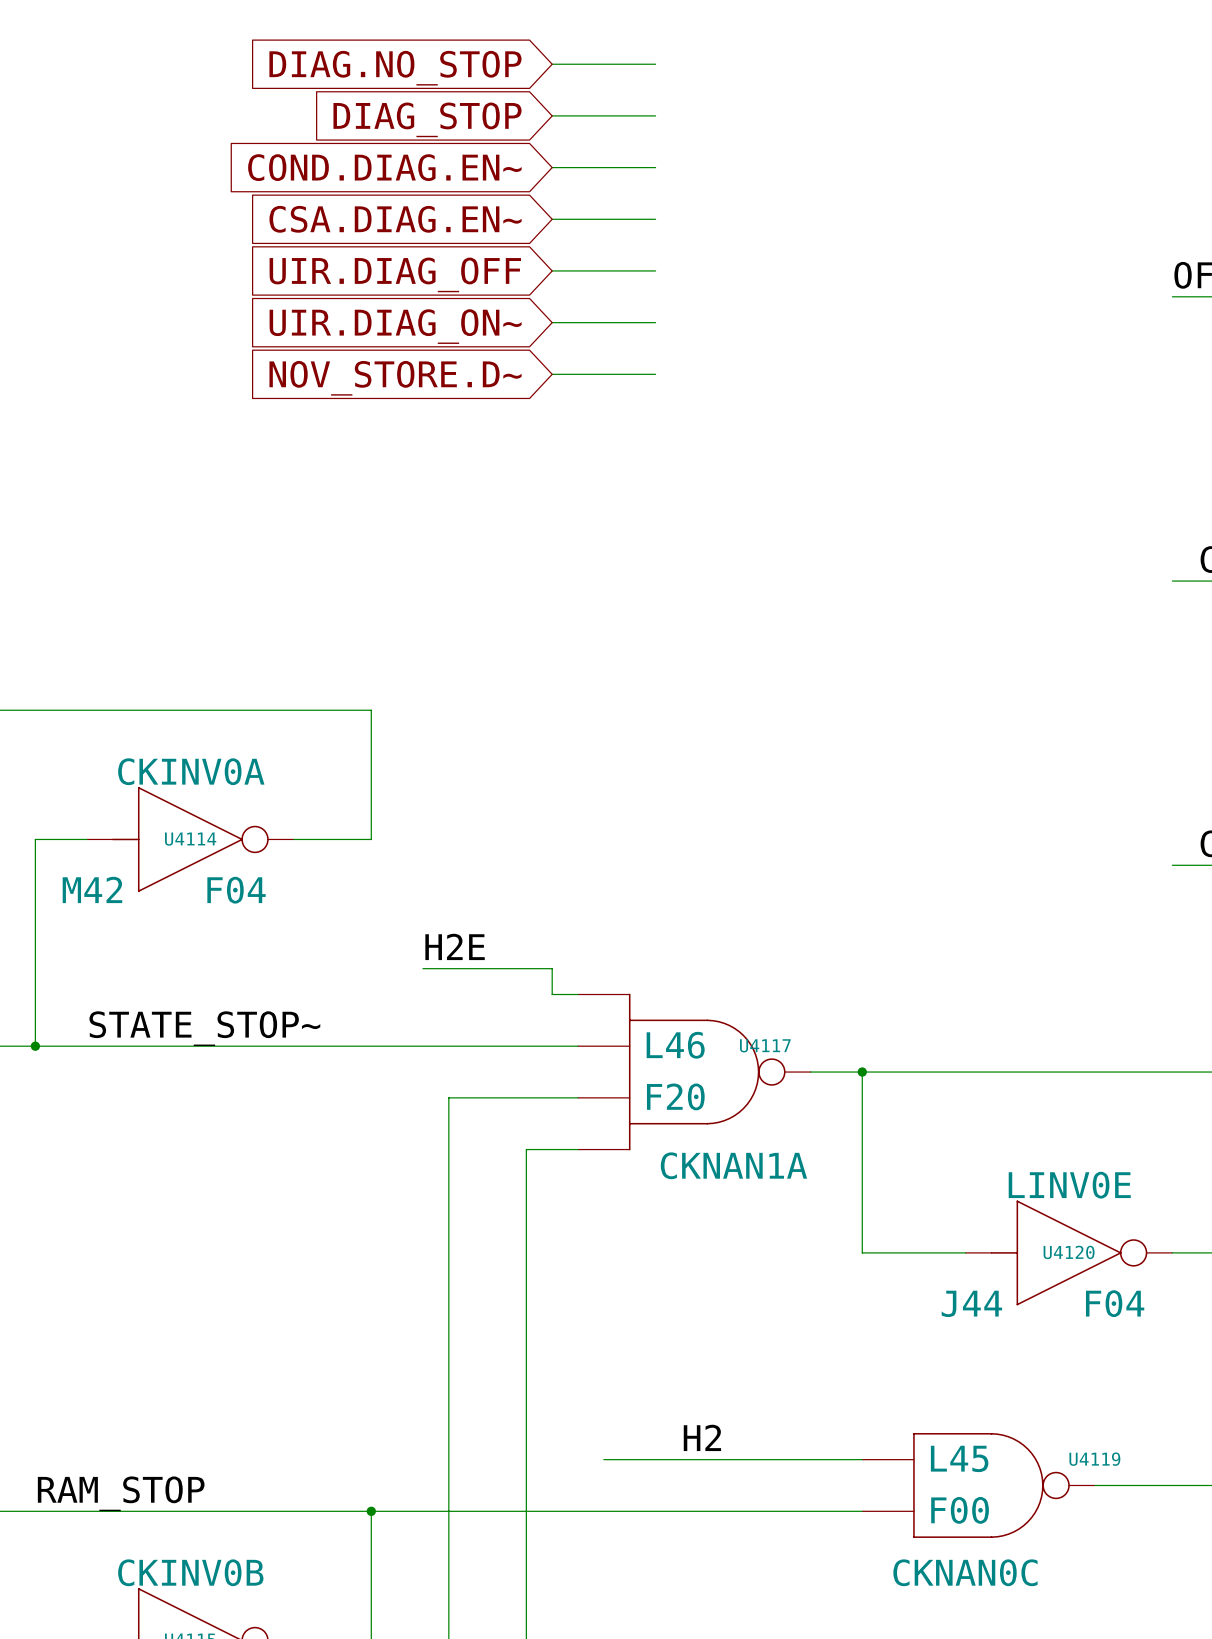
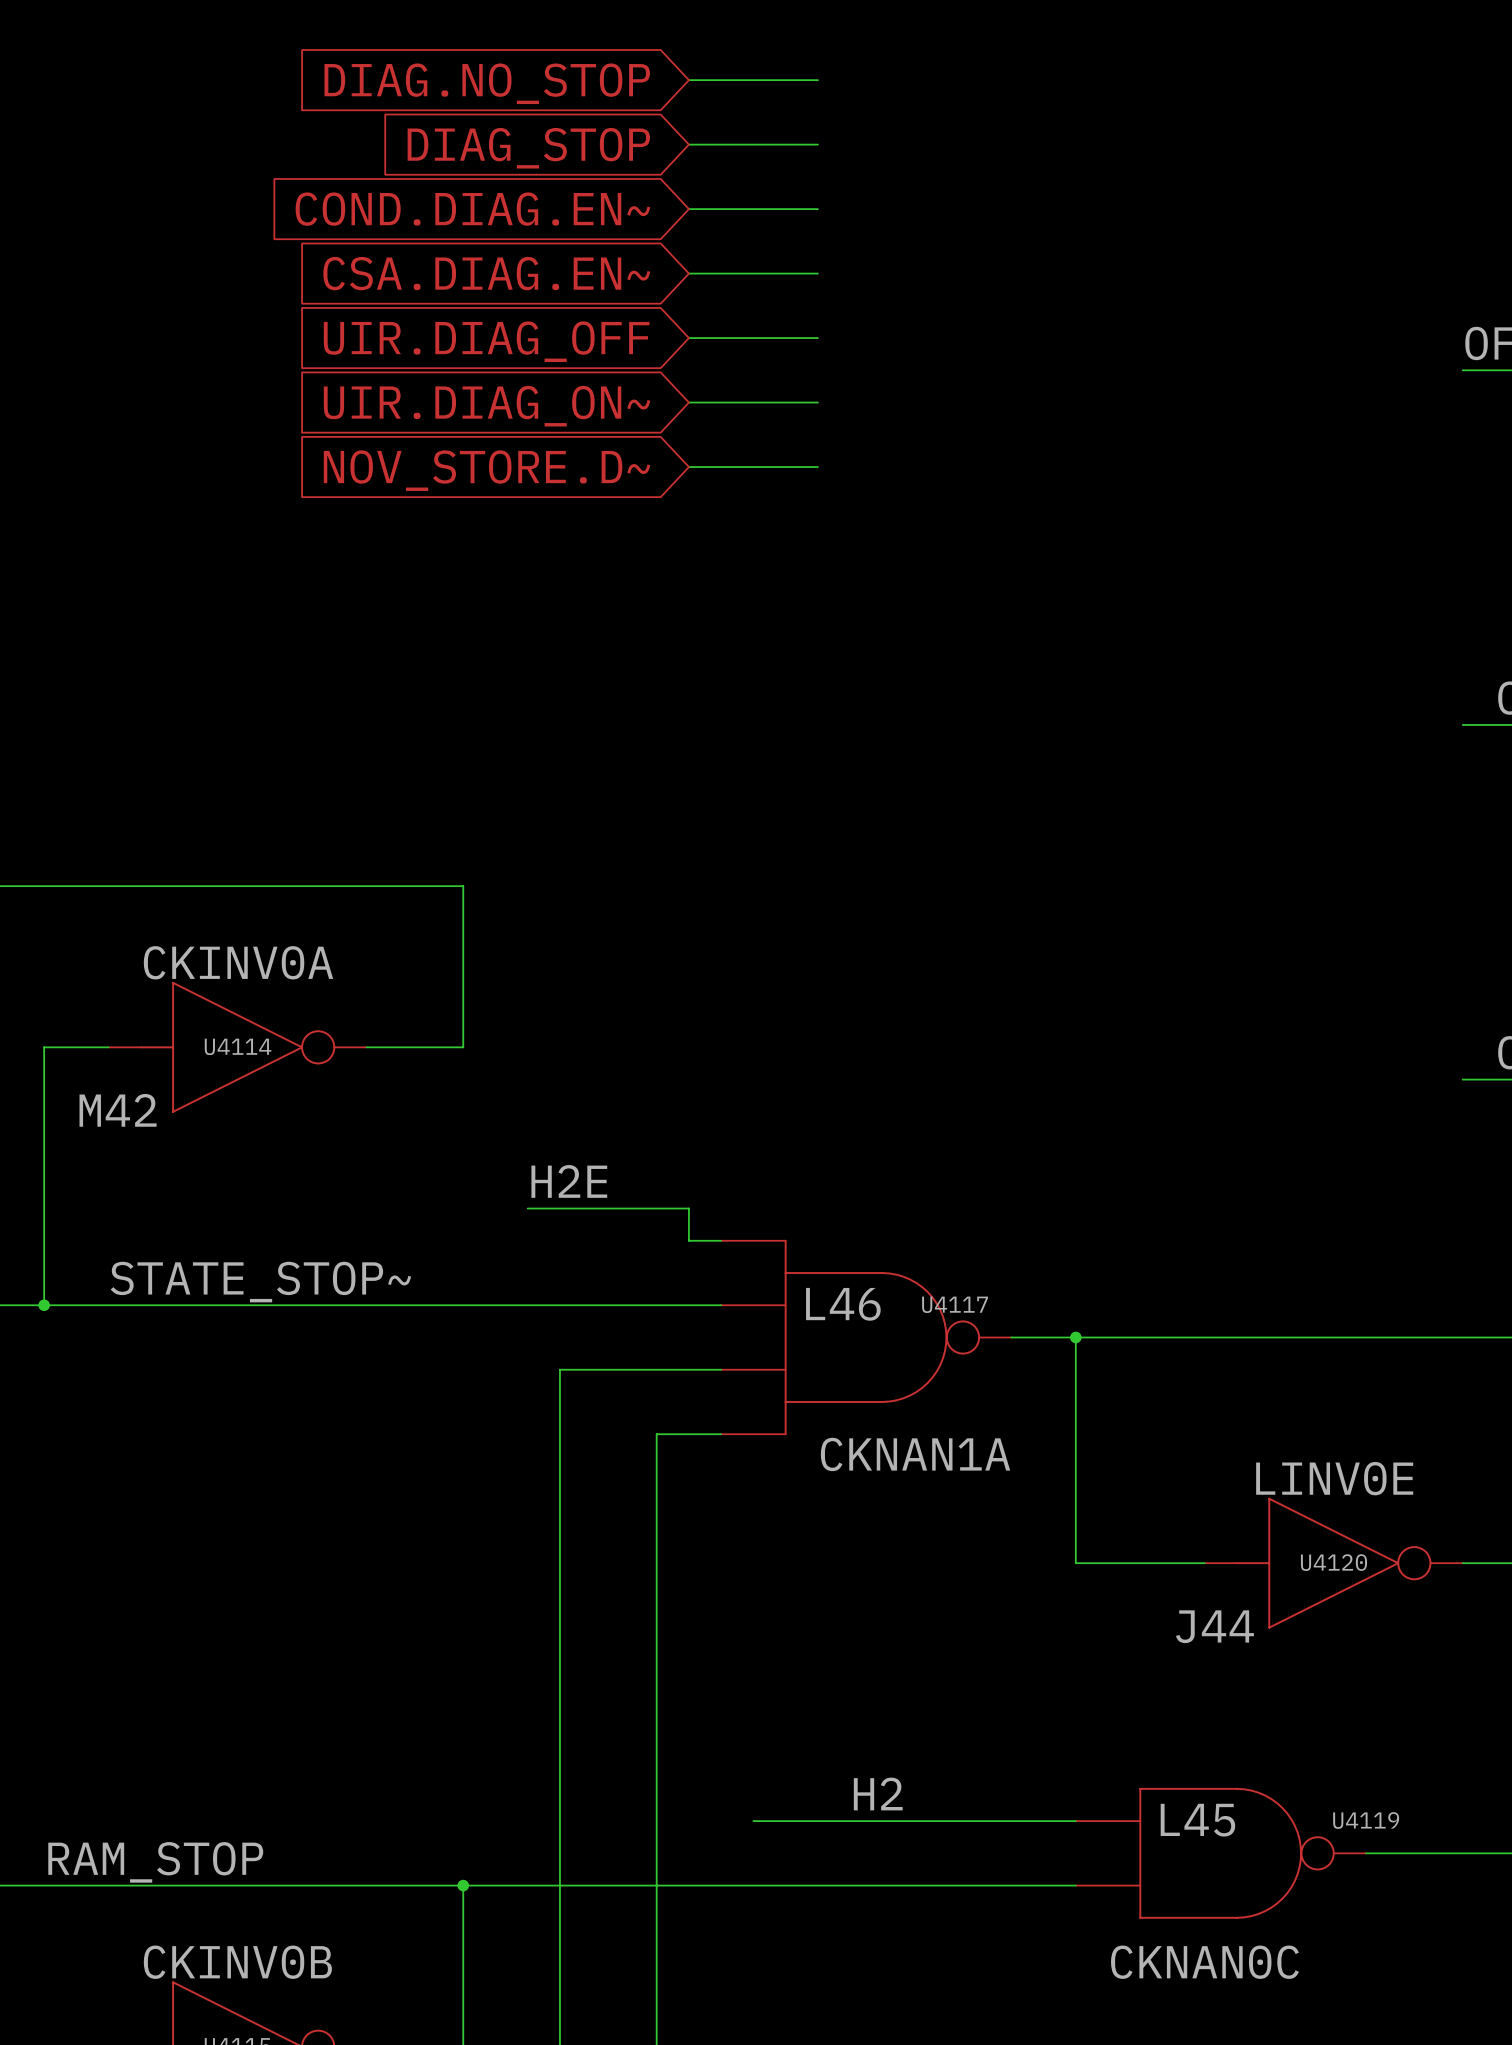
U4114 value: F04 (236, 890) -> none
U4117 value: F20 (675, 1096) -> none
U4120 value: F04 (1115, 1303) -> none
U4119 value: F00 (960, 1510) -> none

